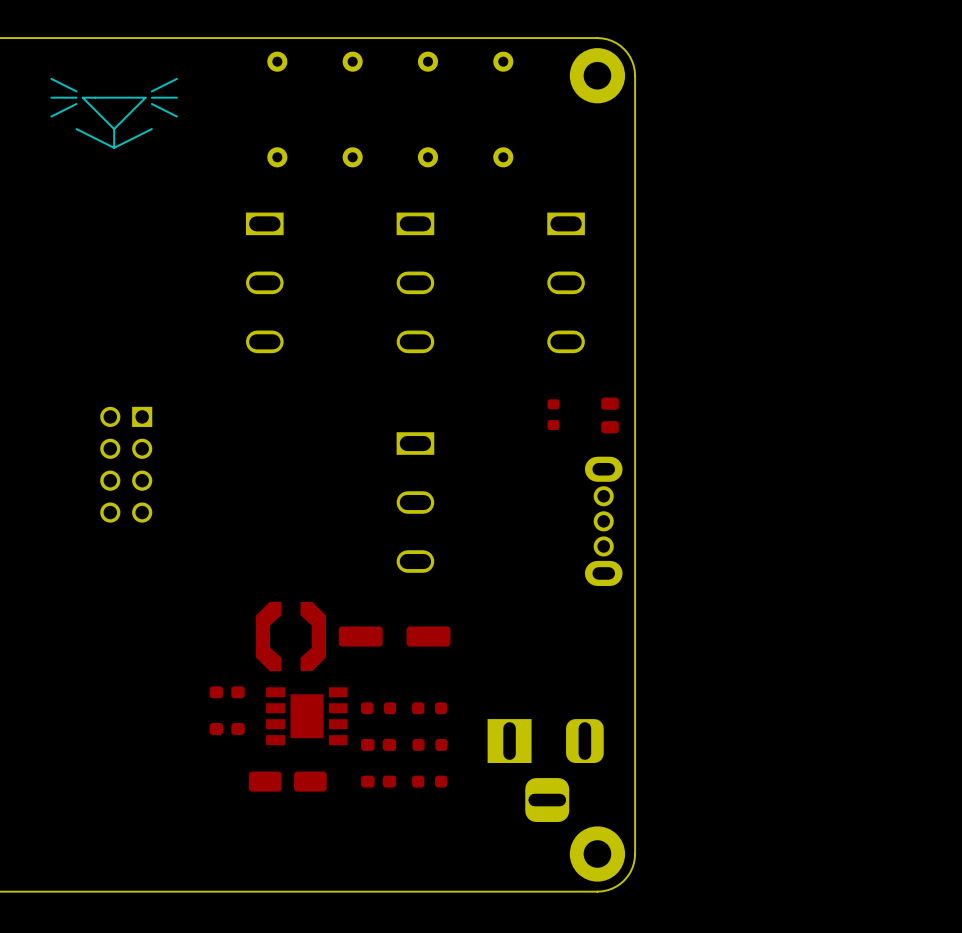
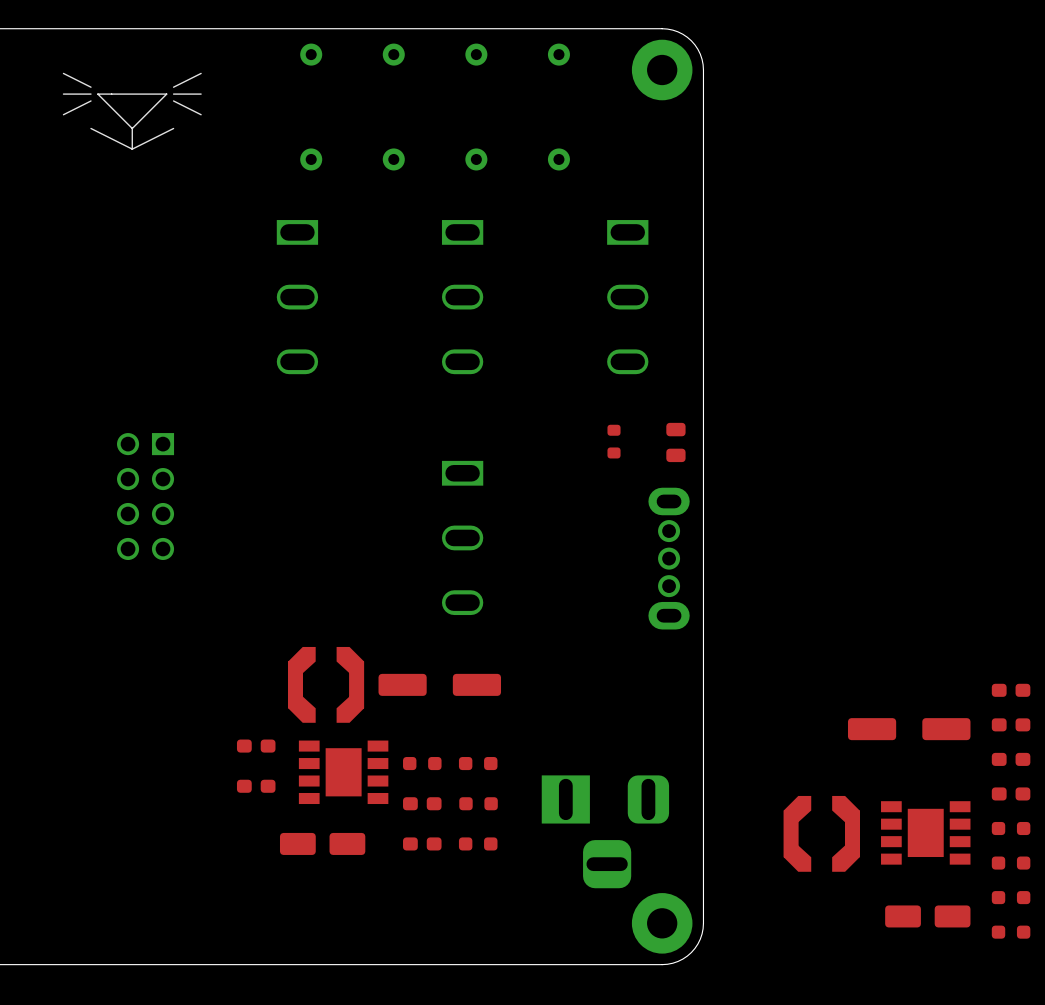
part: none -> (1011, 690)
part: none -> (1011, 724)
part: none -> (909, 729)
part: none -> (1011, 759)
part: none -> (1011, 793)
part: none -> (1011, 828)
part: none -> (925, 832)
part: none -> (821, 833)
part: none -> (1011, 863)
part: none -> (1011, 897)
part: none -> (927, 916)
part: none -> (1011, 932)

